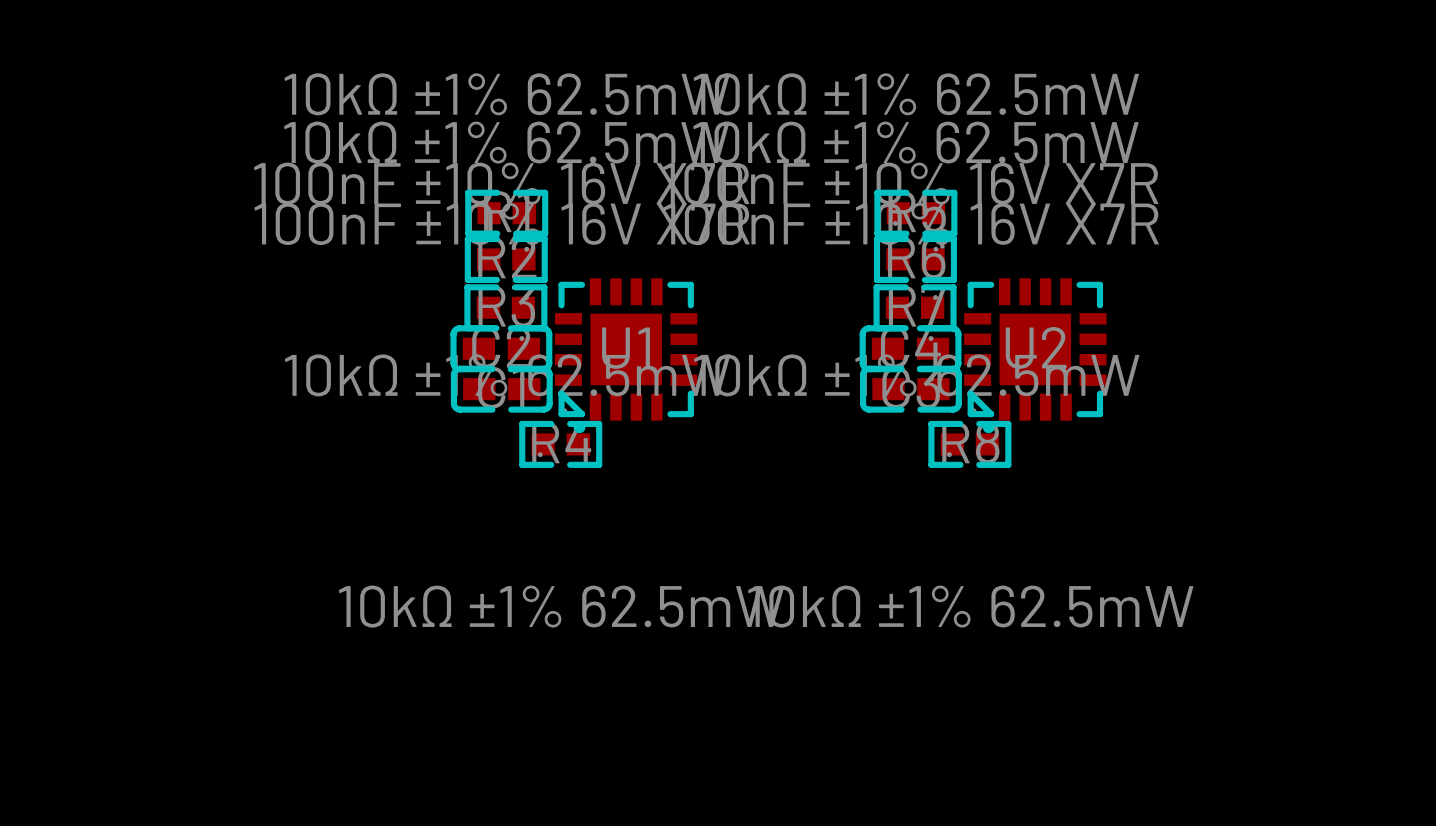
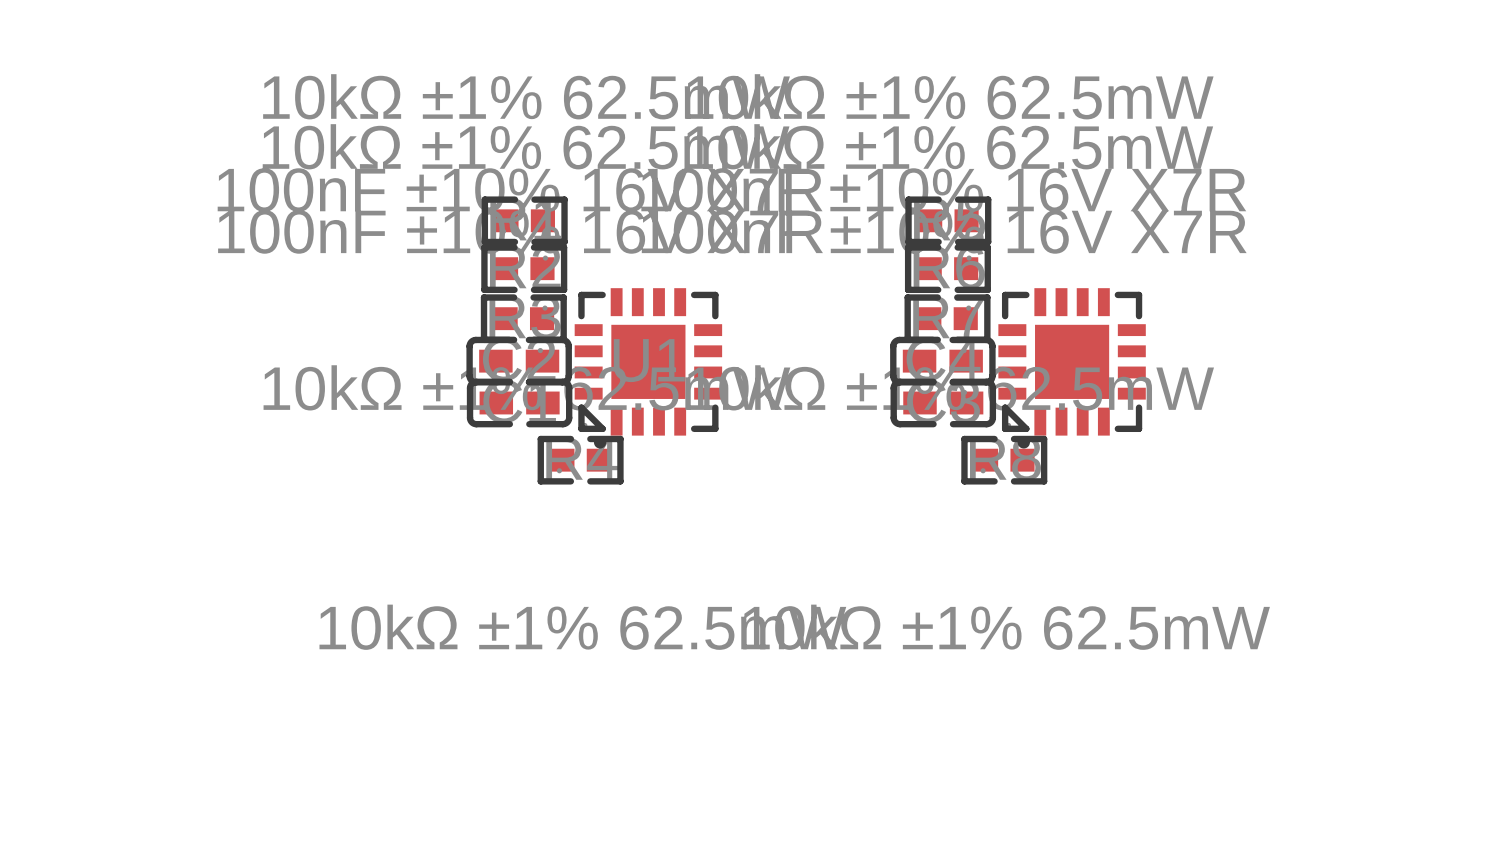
U2 name: U2 (1036, 347) -> none

